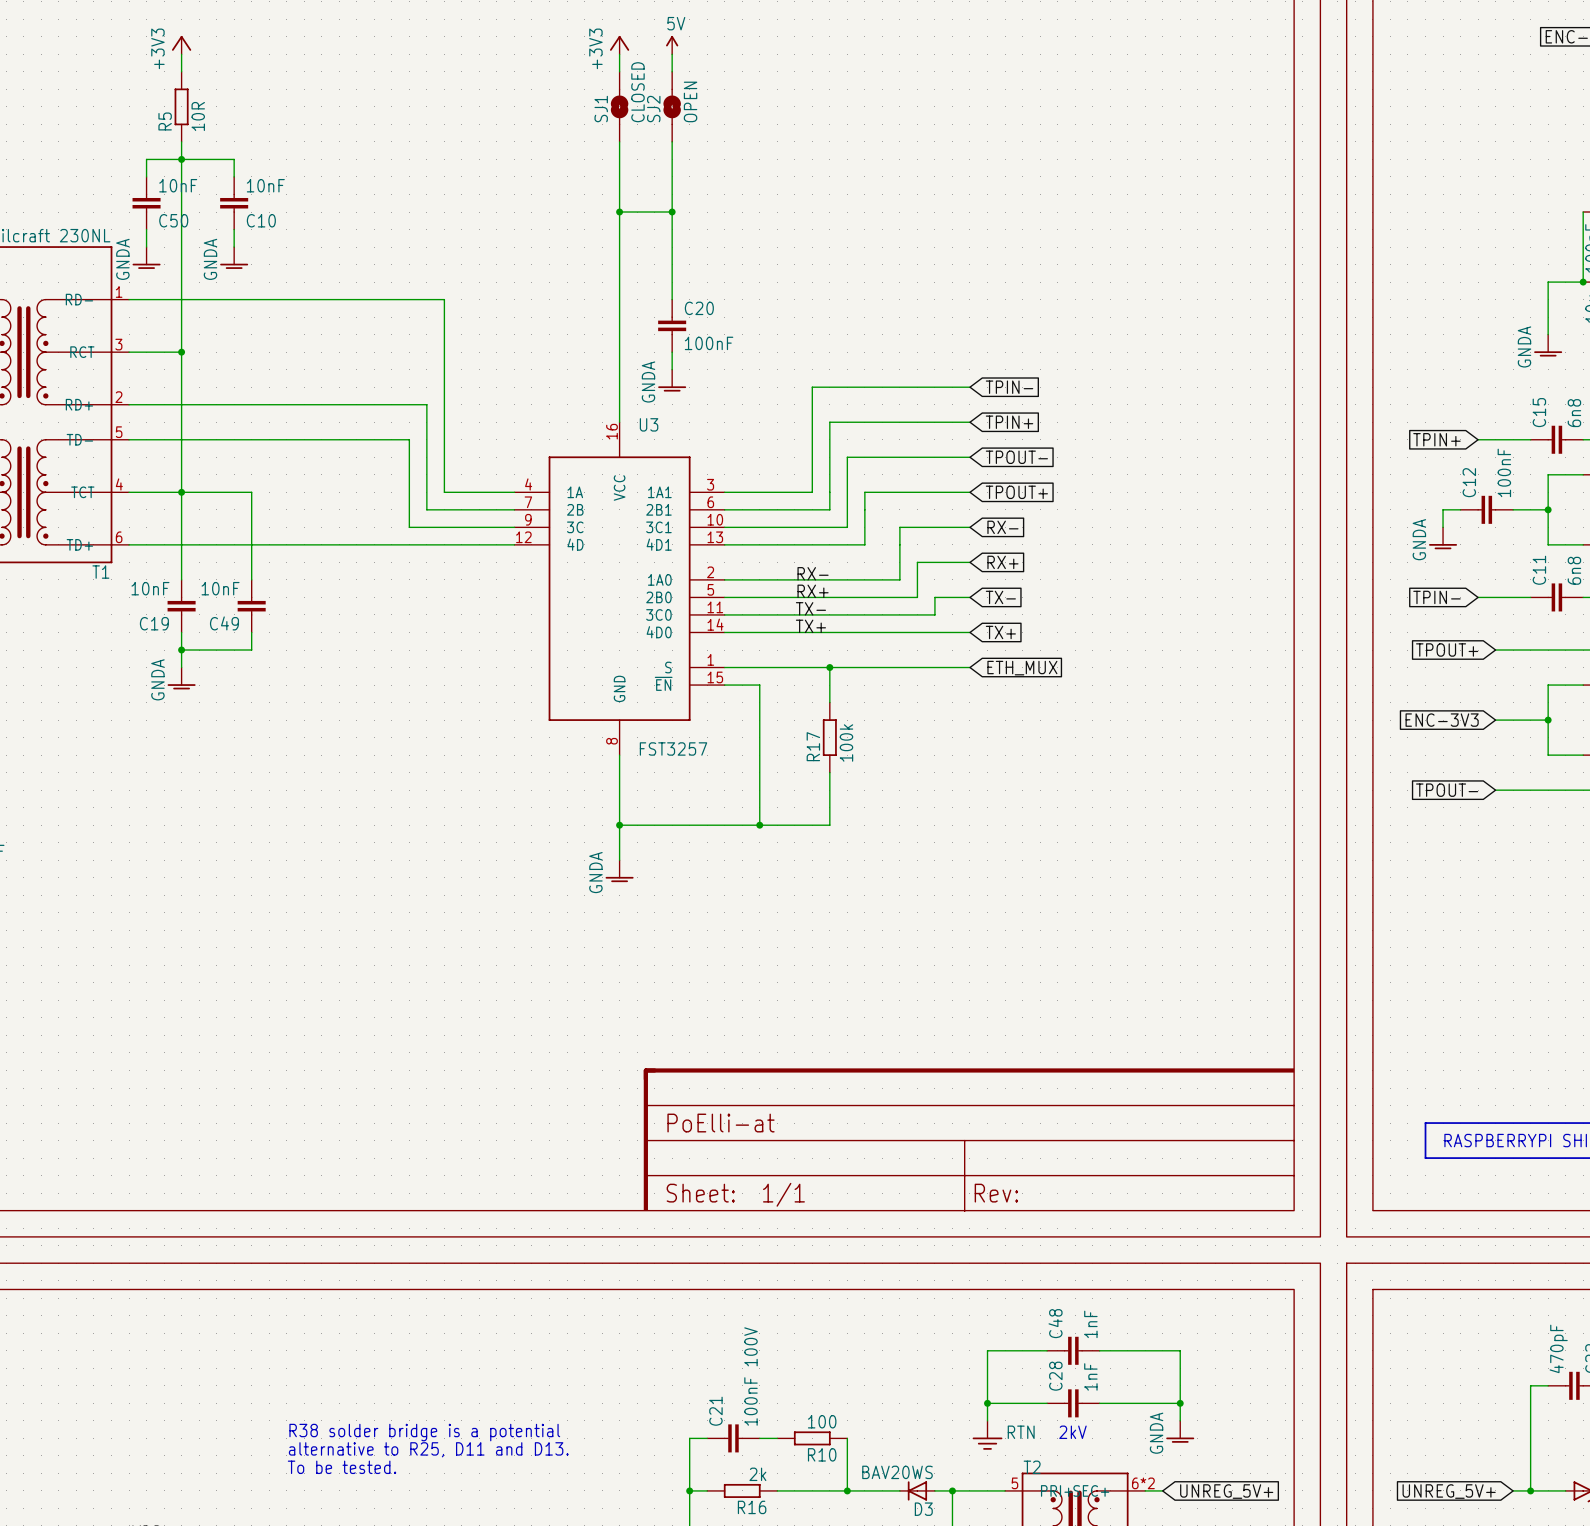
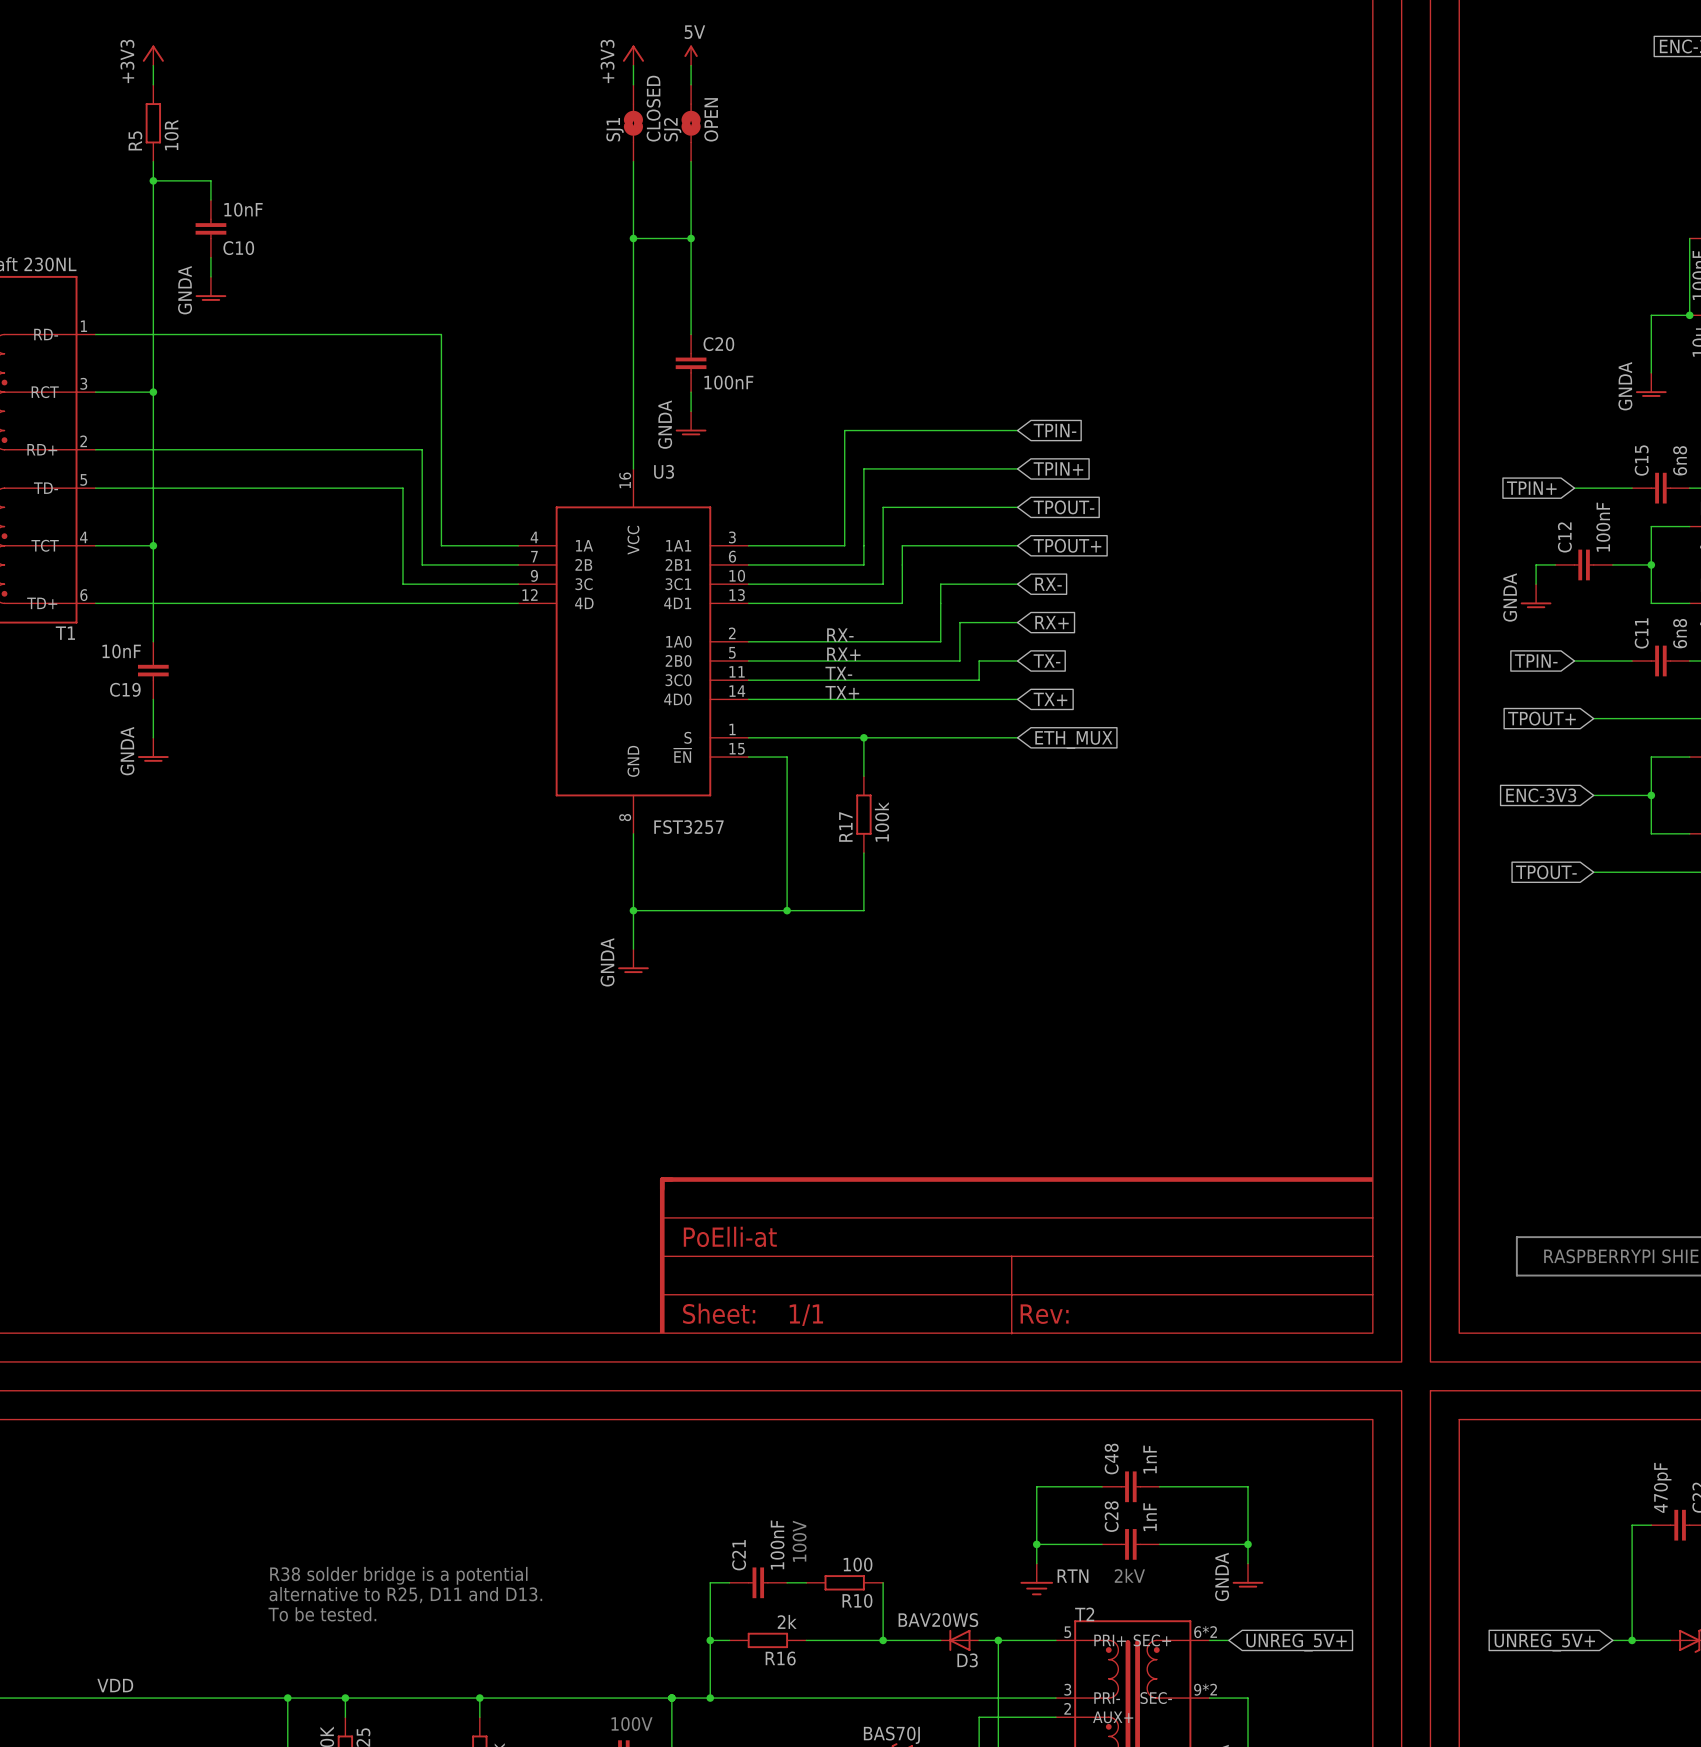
wire: (181, 159) (146, 159) (146, 176) -> none
C50: 10nF (146, 203) -> none
wire: (146, 229) (146, 247) -> none
power symbol: GNDA (146, 257) -> none
wire: (181, 492) (251, 492) (251, 579) -> none
C49: 10nF (251, 606) -> none
wire: (251, 632) (251, 650) (181, 650) -> none
junction: (181, 650) -> none
C21 value: 100nF 100V (750, 1376) -> 100nF (777, 1544)
text: none -> 100V (799, 1541)

